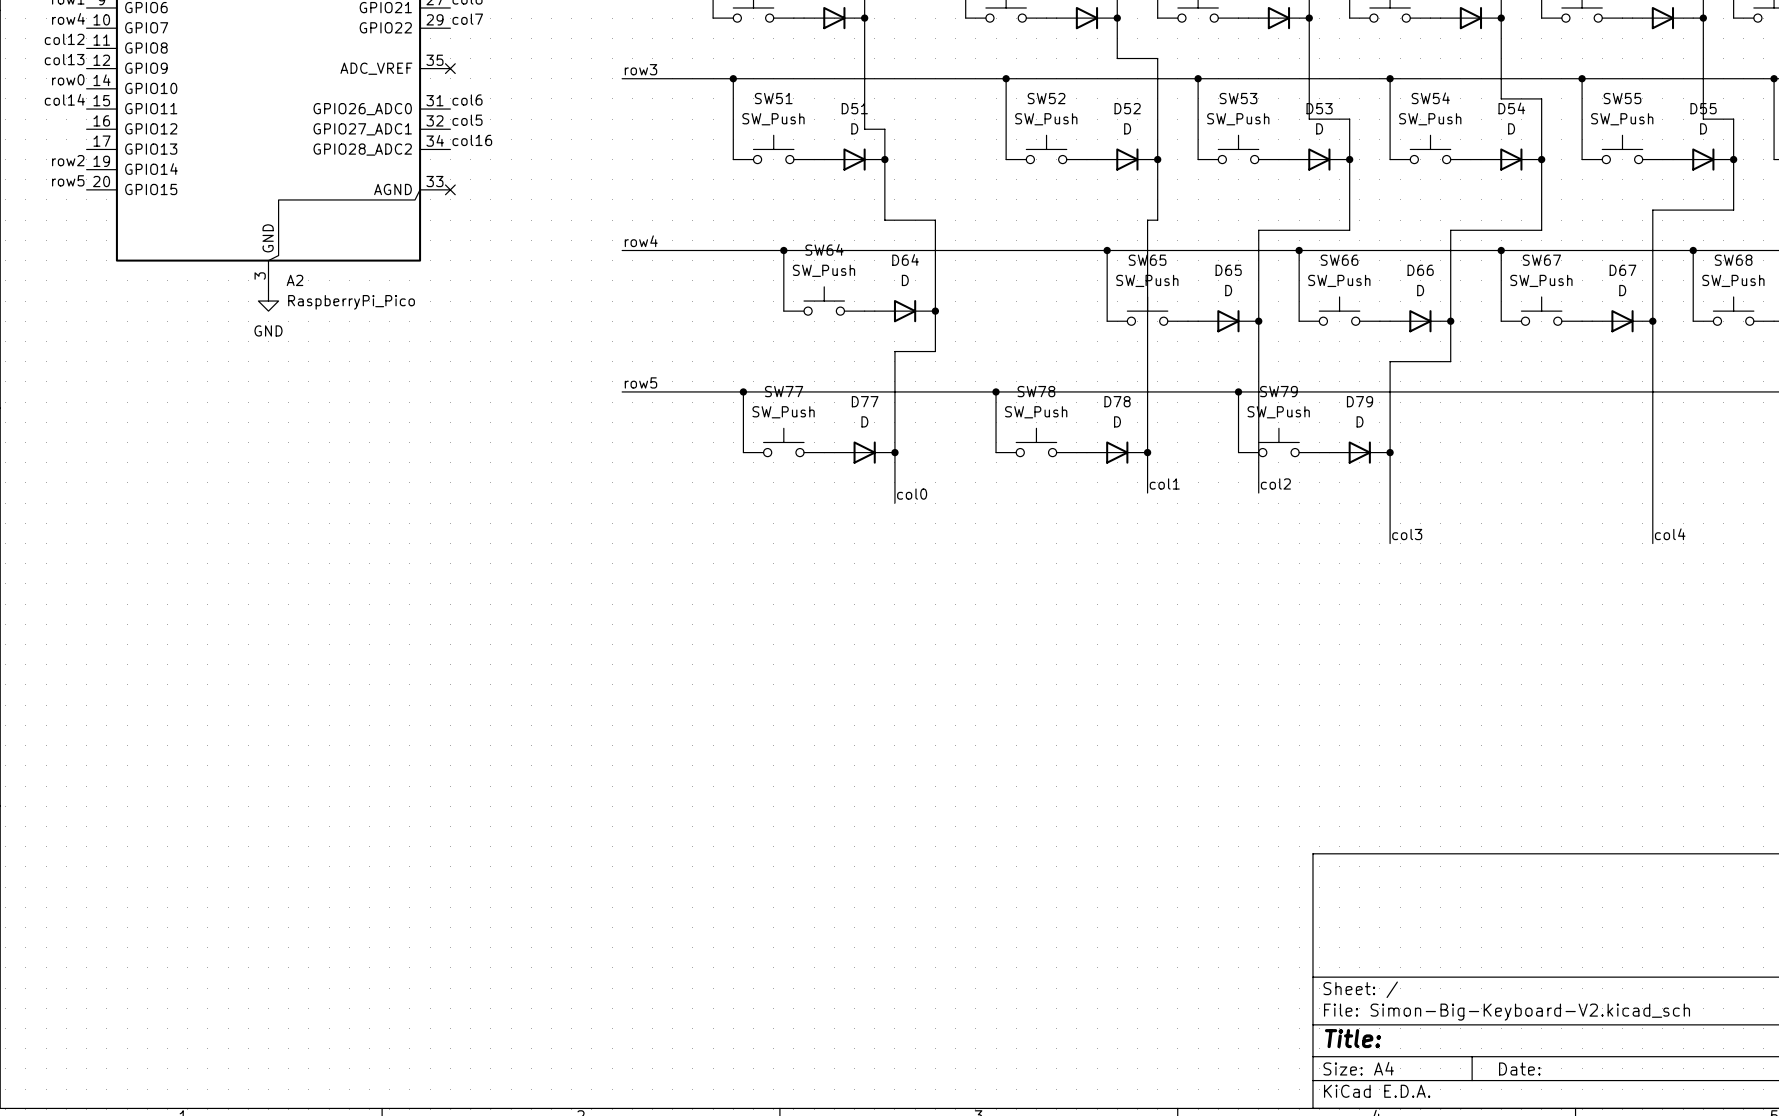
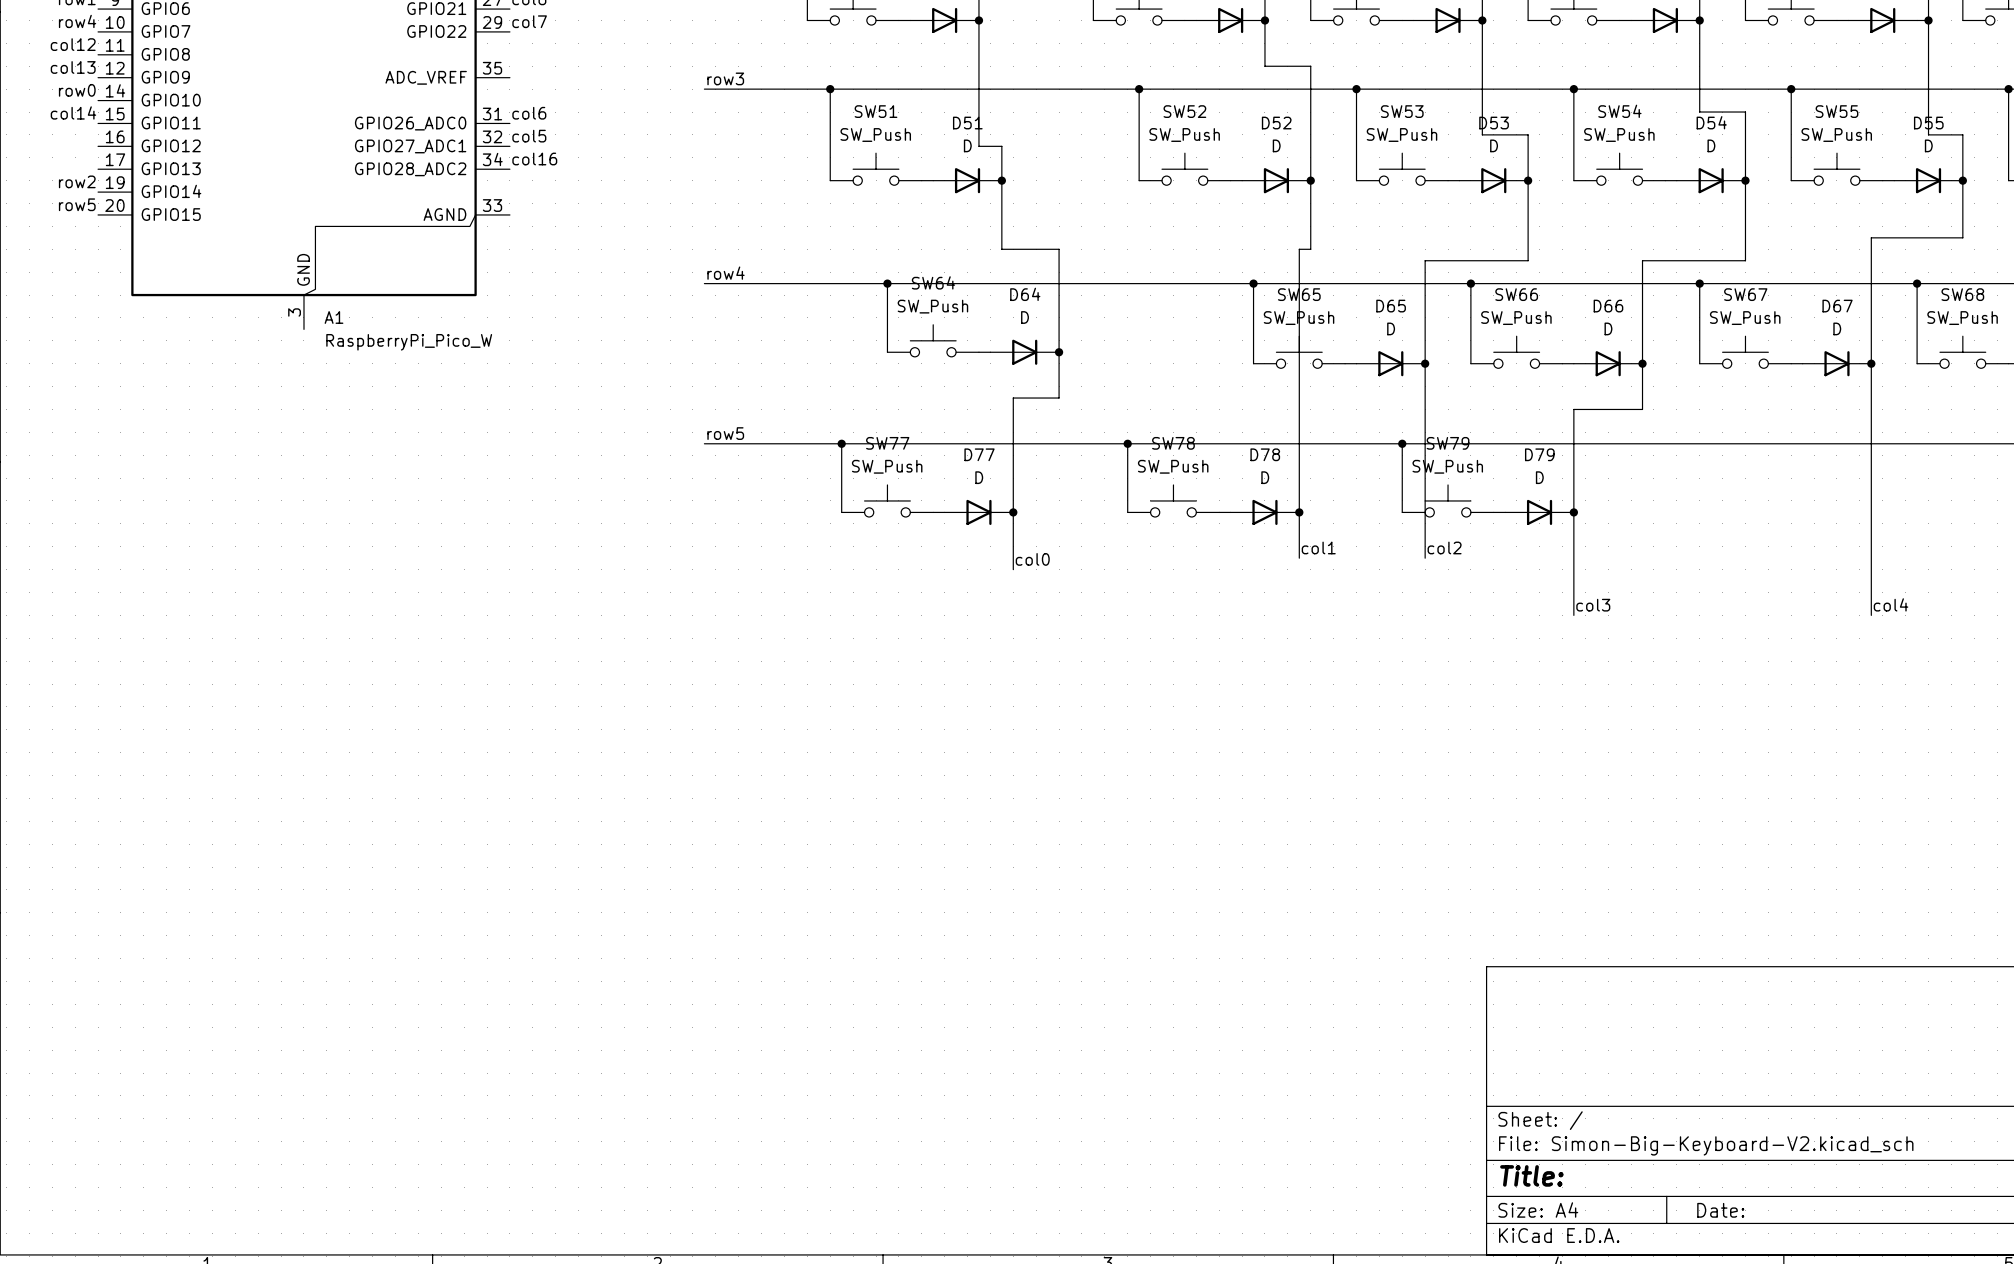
no-connect mark: (450, 68) -> none
no-connect mark: (450, 189) -> none
A2 name: A2 (295, 280) -> A1 (334, 317)
power symbol: GND (268, 301) -> none
A2 value: RaspberryPi_Pico (351, 302) -> RaspberryPi_Pico_W (409, 342)

